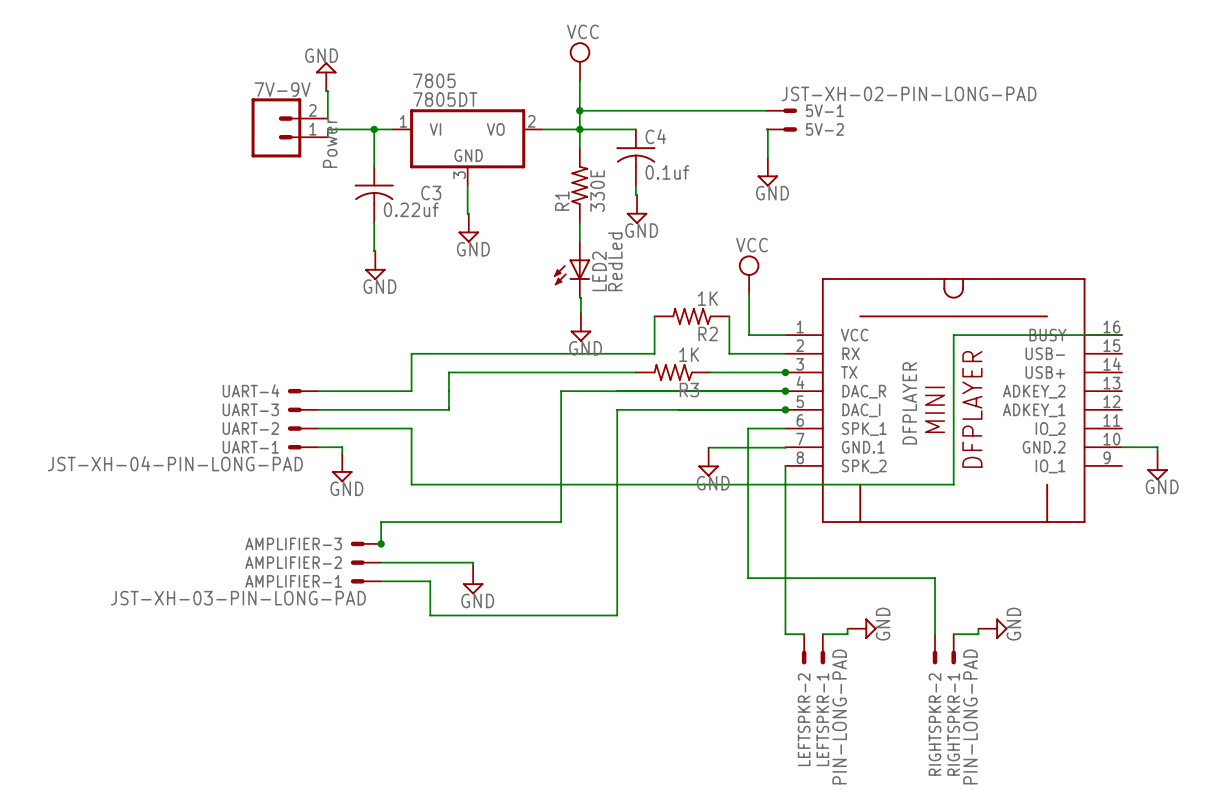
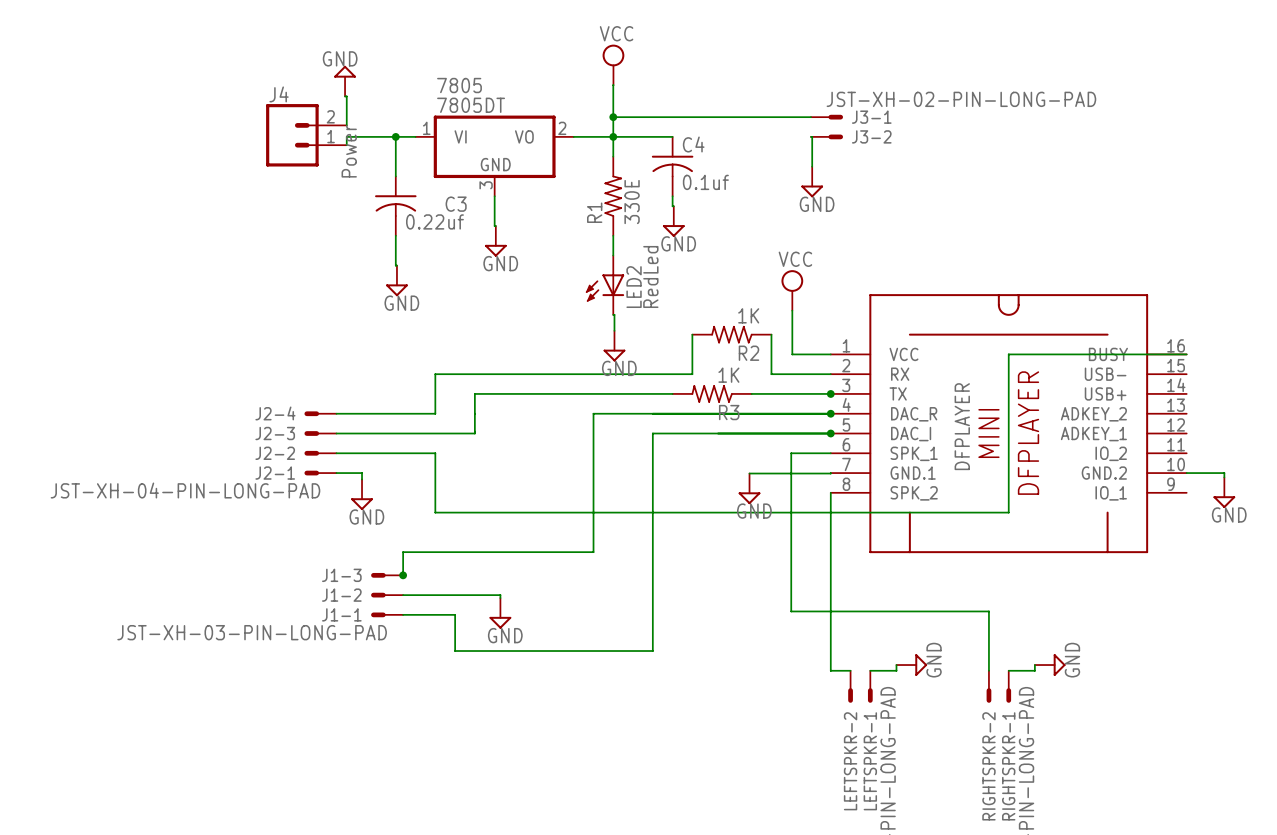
7V-9V name: 7V-9V (282, 89) -> J4 (279, 94)
5V-1 name: 5V-1 (824, 110) -> J3-1 (871, 117)
5V-2 name: 5V-2 (824, 129) -> J3-2 (871, 136)
UART-4 name: UART-4 (251, 390) -> J2-4 (275, 413)
UART-3 name: UART-3 (250, 409) -> J2-3 (275, 433)
UART-2 name: UART-2 (250, 428) -> J2-2 (275, 453)
UART-1 name: UART-1 (250, 447) -> J2-1 (275, 473)
AMPLIFIER-3 name: AMPLIFIER-3 (293, 543) -> J1-3 (341, 575)
AMPLIFIER-2 name: AMPLIFIER-2 (293, 562) -> J1-2 (341, 595)
AMPLIFIER-1 name: AMPLIFIER-1 (293, 581) -> J1-1 (341, 614)

